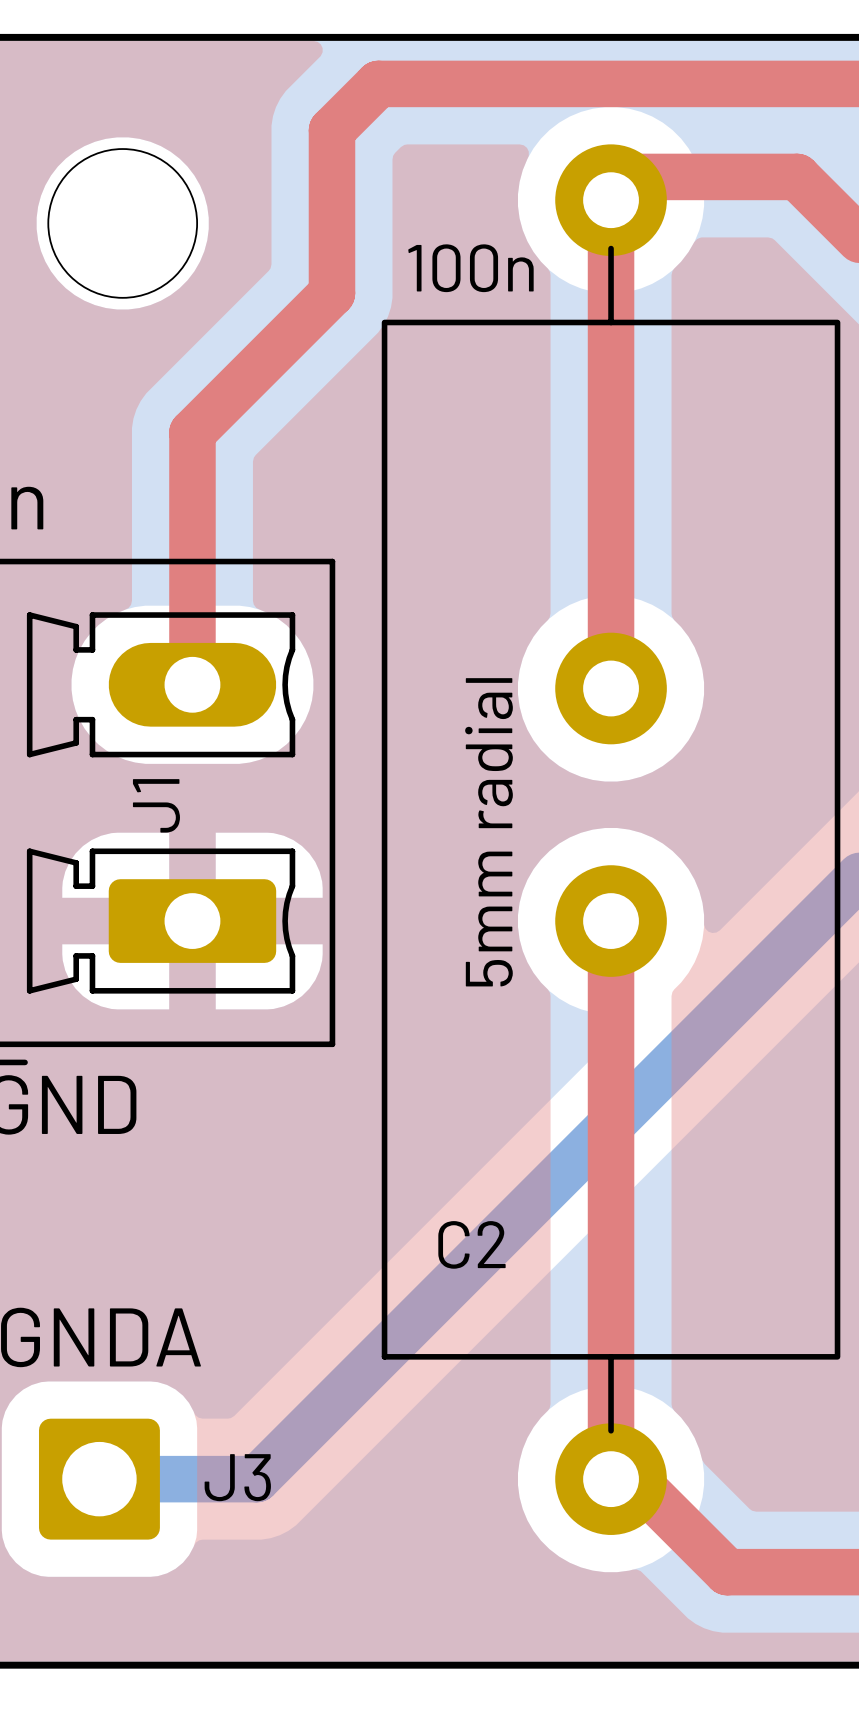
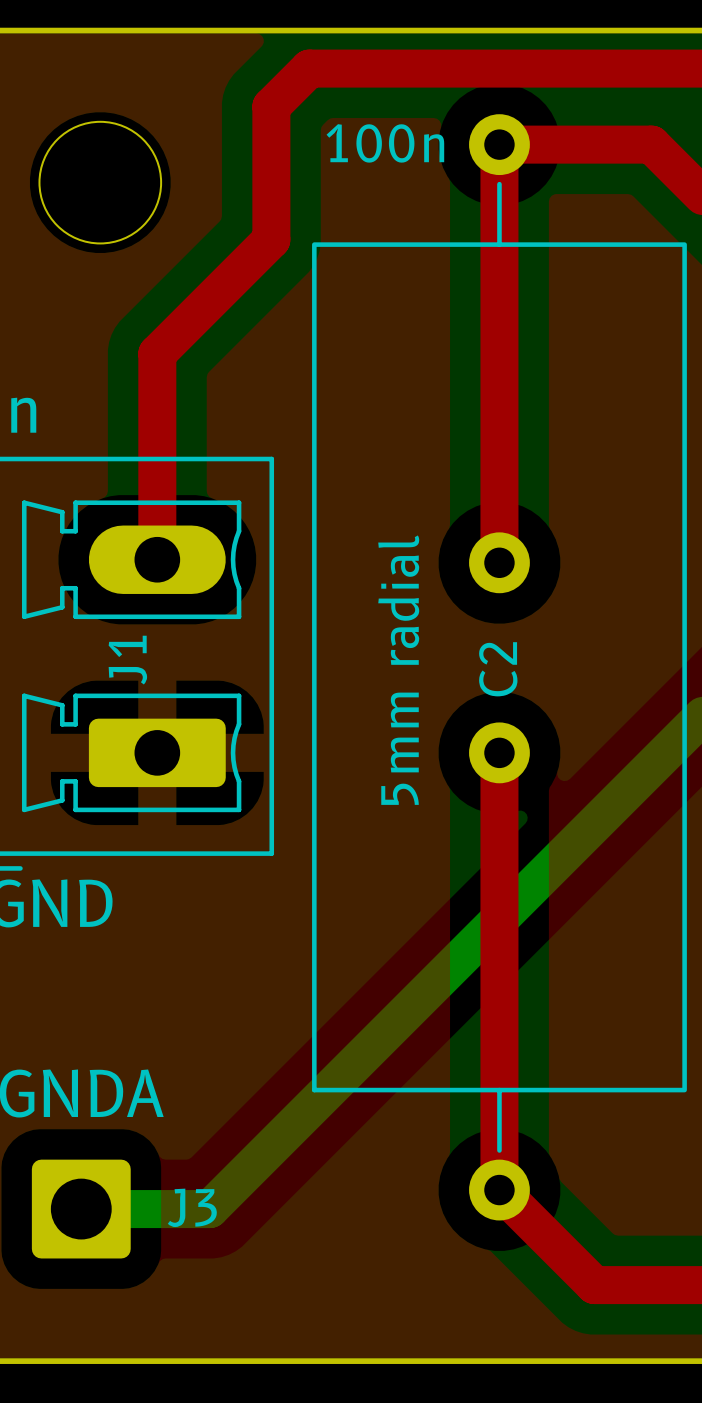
C2 footprint: [381, 144, 841, 1535] -> [312, 114, 687, 1221]
C2 value position: 100n (470, 268) -> 100n (385, 143)
part footprint: [555, 632, 667, 745] -> [469, 532, 530, 594]
part footprint: [555, 865, 667, 977] -> [469, 722, 530, 784]
C2 name rotation: 0° (471, 1244) -> 90° counterclockwise (498, 669)
C2 name position: C2 (471, 1244) -> C2 (498, 669)

